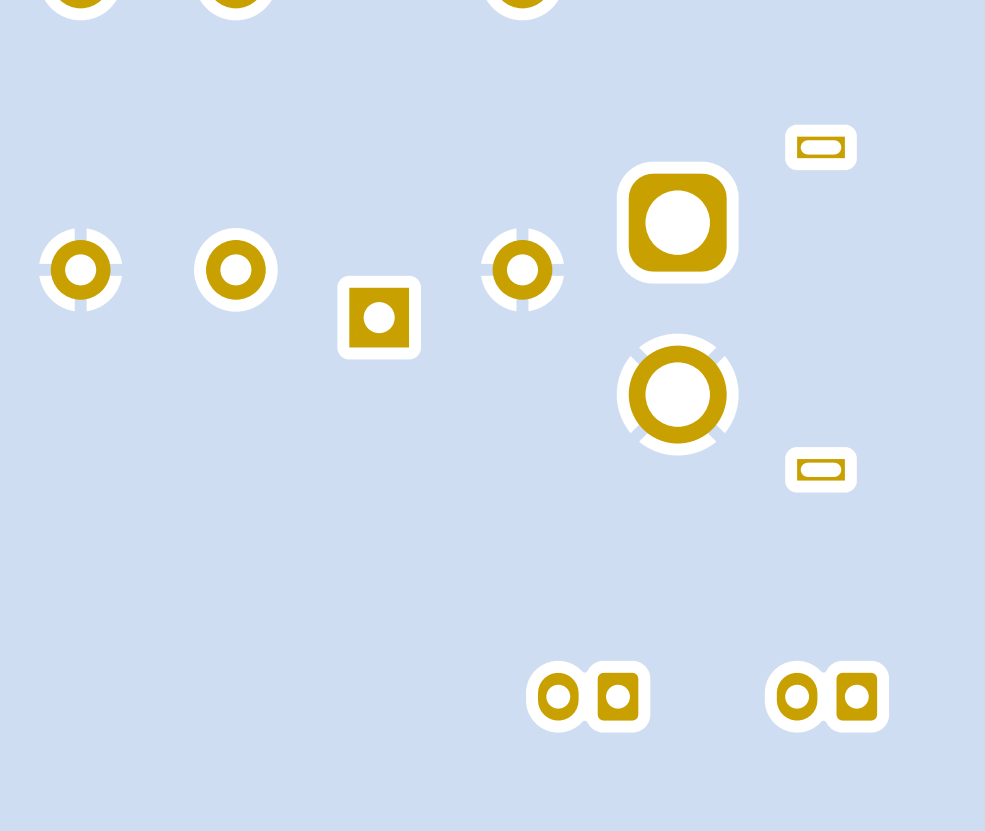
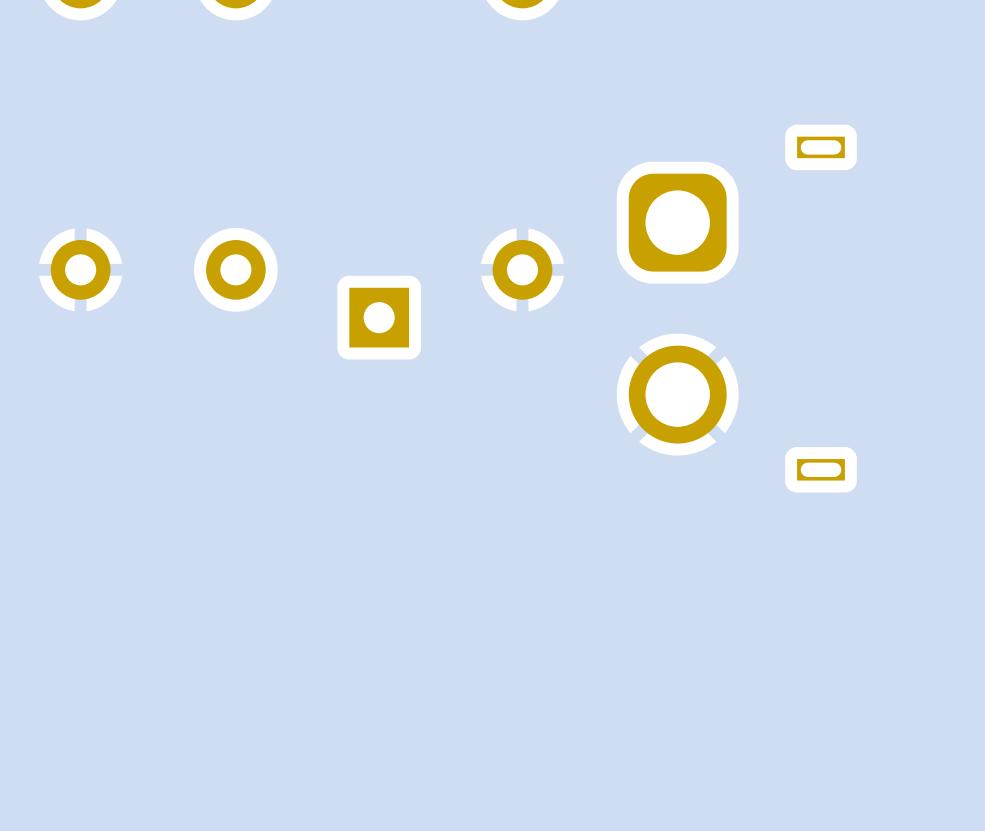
part: (588, 696) -> none
part: (826, 696) -> none

